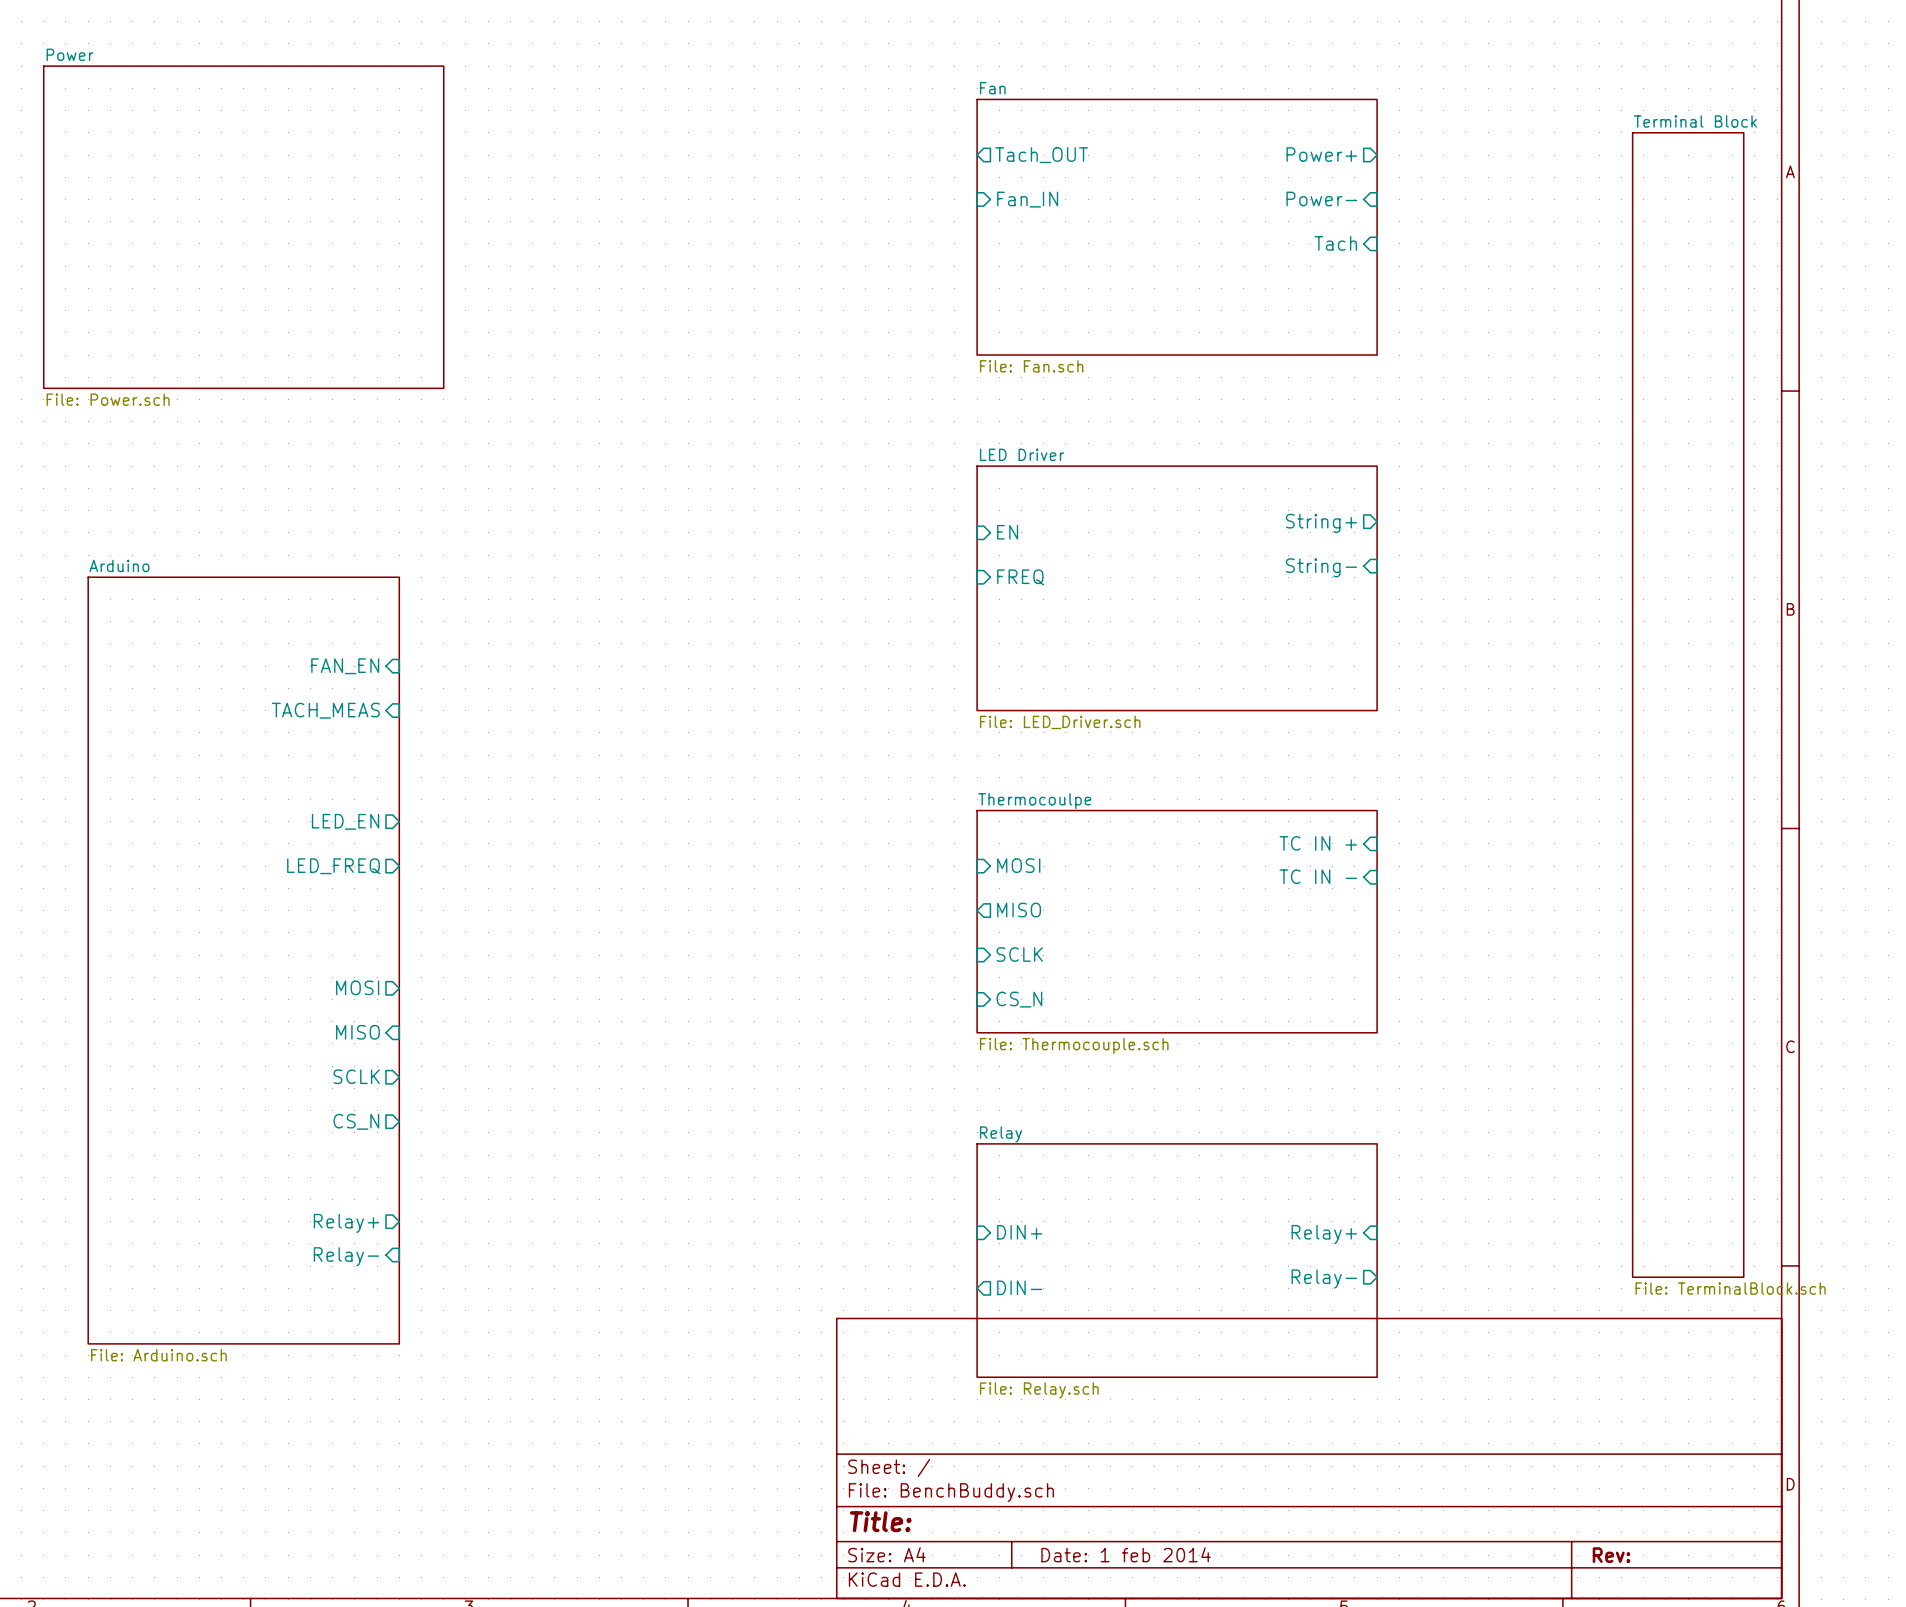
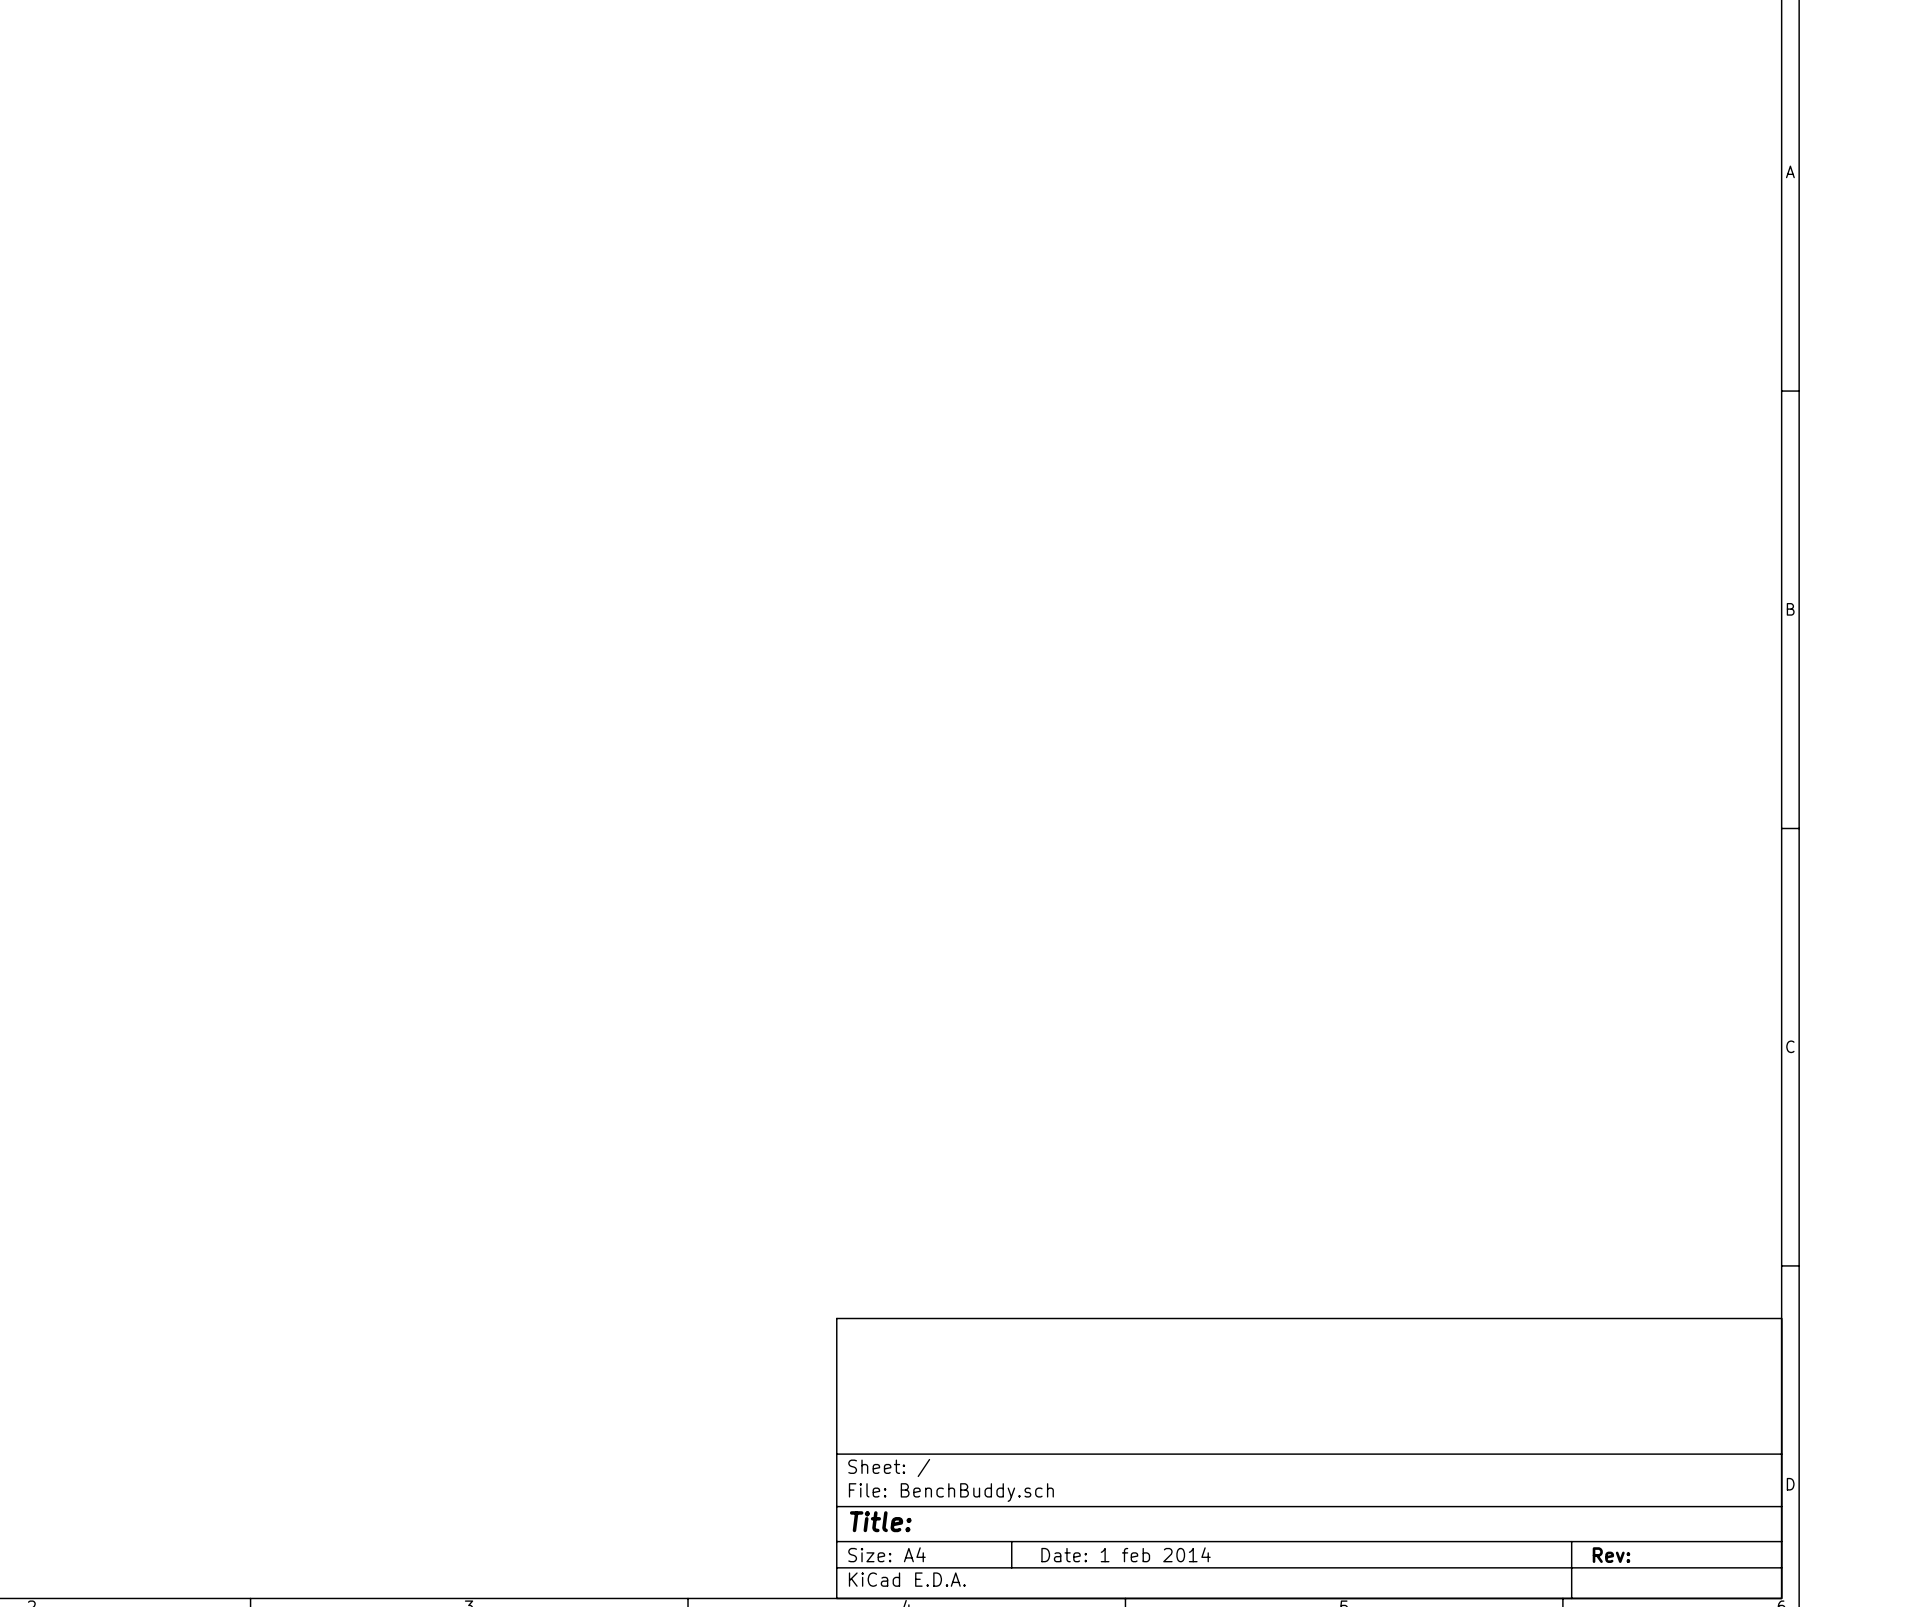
sheet pin: Power+ (1321, 154) -> none
sheet pin: Tach_OUT (1041, 155) -> none
sheet pin: Power- (1321, 198) -> none
sheet pin: Fan_IN (1027, 199) -> none
sheet Power: File: Power.sch (243, 227) -> none
sheet Fan: File: Fan.sch (1177, 227) -> none
sheet pin: Tach (1335, 243) -> none
sheet pin: String+ (1321, 523) -> none
sheet pin: EN (1007, 532) -> none
sheet pin: String- (1321, 567) -> none
sheet pin: FREQ (1020, 577) -> none
sheet LED Driver: File: LED_Driver.sch (1177, 588) -> none
sheet pin: FAN_EN (345, 666) -> none
sheet Terminal Block: File: TerminalBlock.sch (1688, 705) -> none
sheet pin: TACH_MEAS (325, 710) -> none
sheet pin: LED_EN (345, 821) -> none
sheet pin: TC IN + (1318, 843) -> none
sheet pin: MOSI (1018, 865) -> none
sheet pin: LED_FREQ (333, 866) -> none
sheet pin: TC IN - (1318, 876) -> none
sheet pin: MISO (1019, 910) -> none
sheet Thermocoulpe: File: Thermocouple.sch (1177, 921) -> none
sheet pin: SCLK (1019, 954) -> none
sheet Arduino: File: Arduino.sch (243, 960) -> none
sheet pin: MOSI (357, 987) -> none
sheet pin: CS_N (1019, 999) -> none
sheet pin: MISO (357, 1032) -> none
sheet pin: SCLK (356, 1076) -> none
sheet pin: CS_N (356, 1121) -> none
sheet pin: Relay+ (346, 1223) -> none
sheet pin: DIN+ (1019, 1232) -> none
sheet pin: Relay+ (1324, 1234) -> none
sheet pin: Relay- (346, 1256) -> none
sheet Relay: File: Relay.sch (1177, 1260) -> none
sheet pin: Relay- (1324, 1278) -> none
sheet pin: DIN- (1019, 1287) -> none

